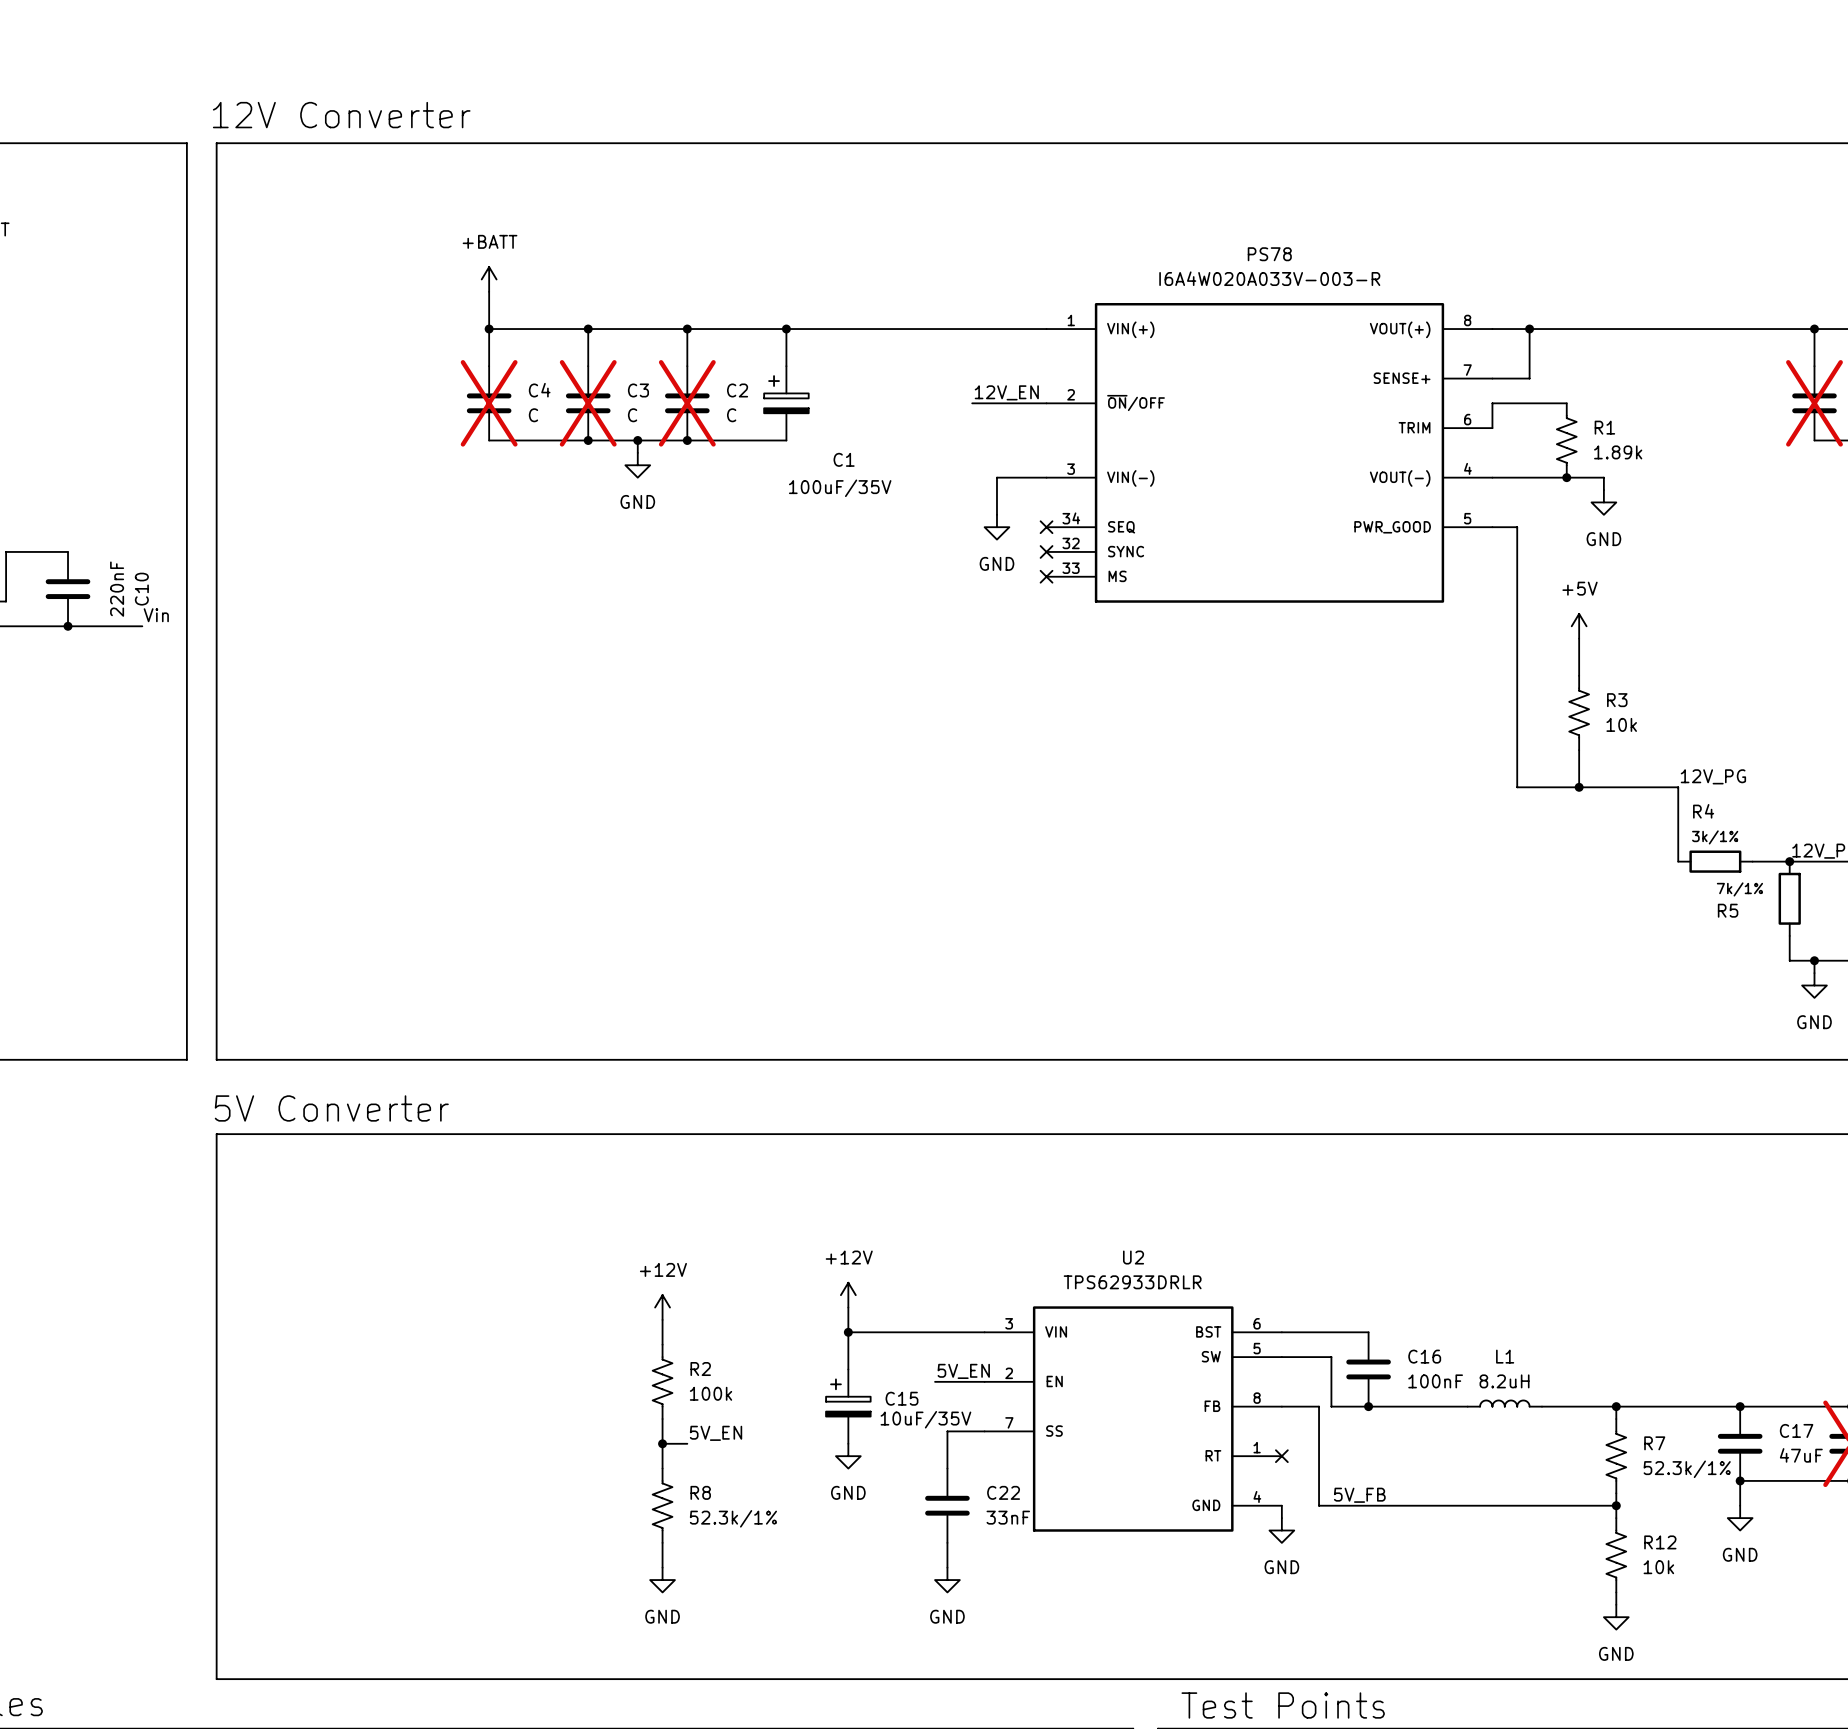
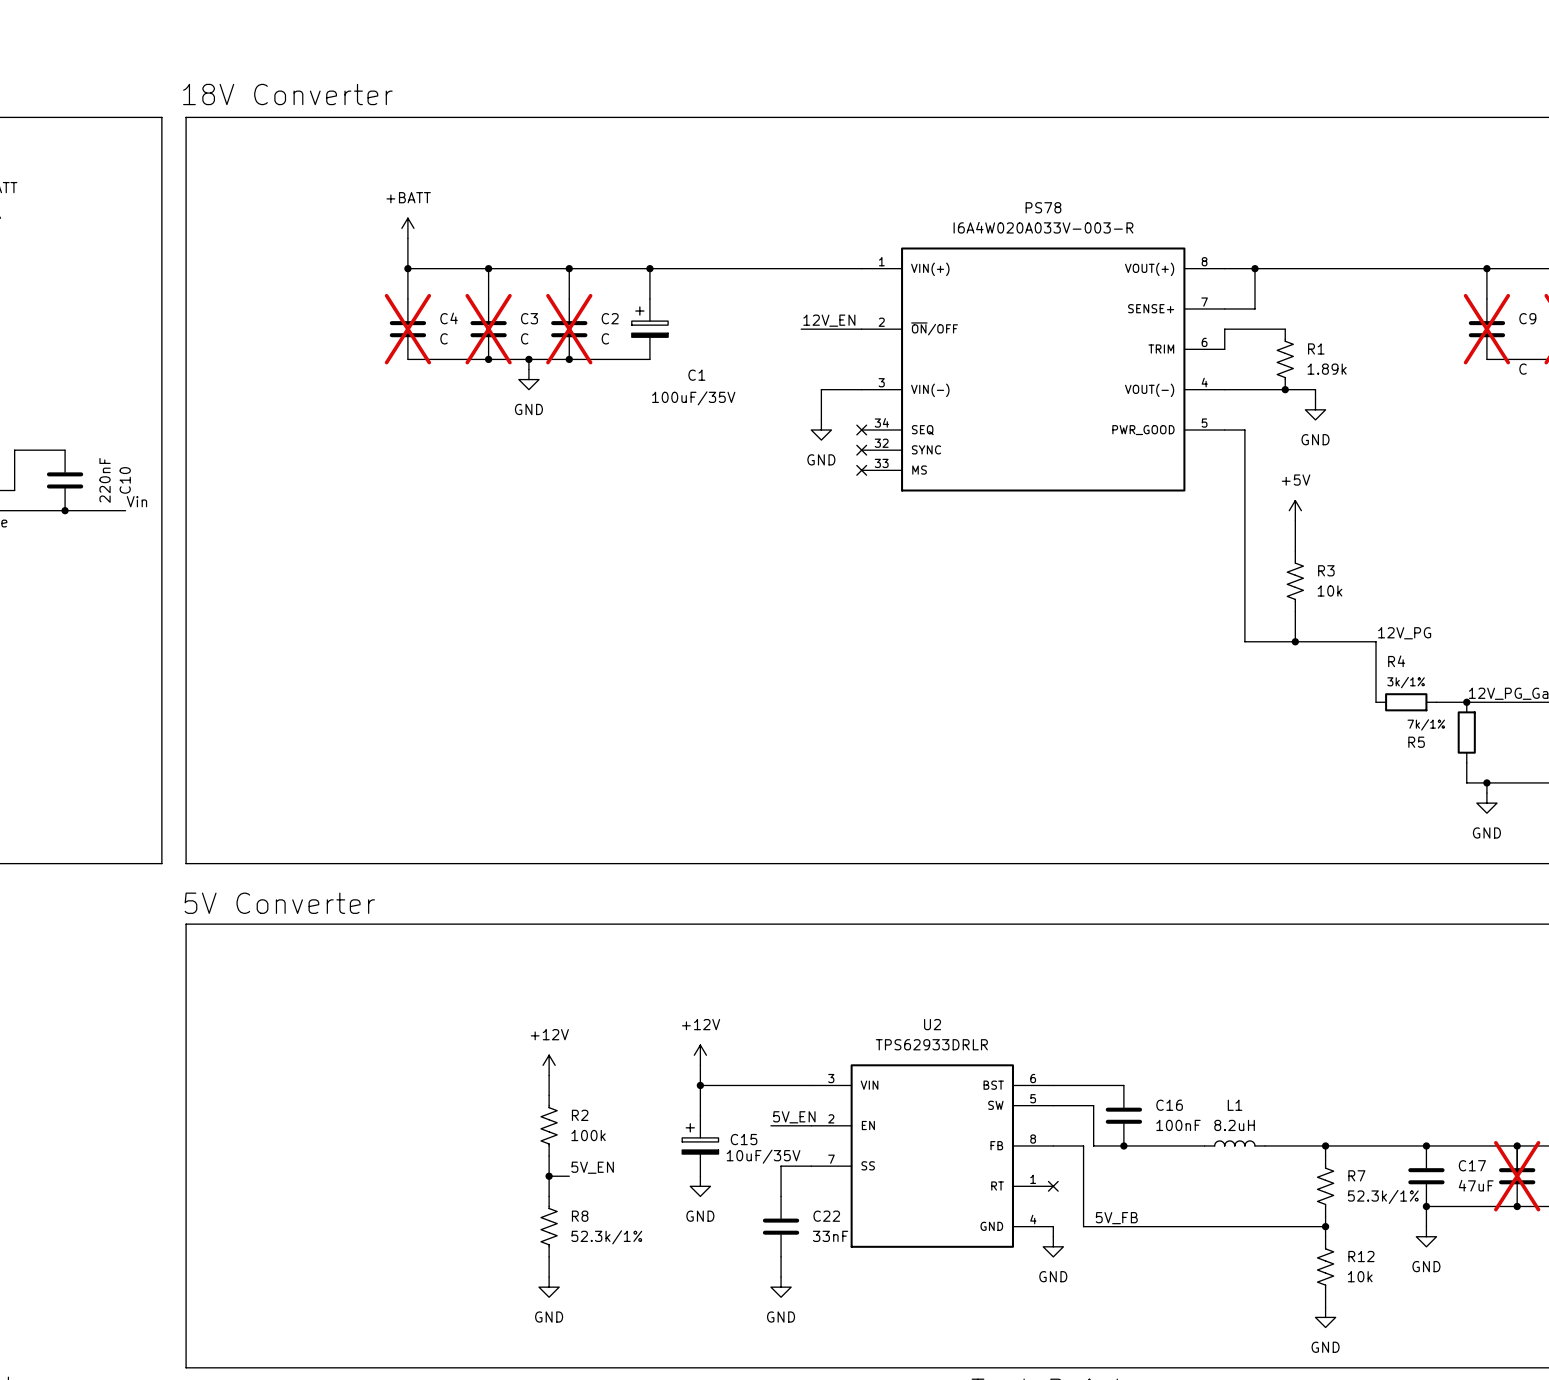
text: 12V Converter (341, 115) -> 18V Converter (287, 94)

